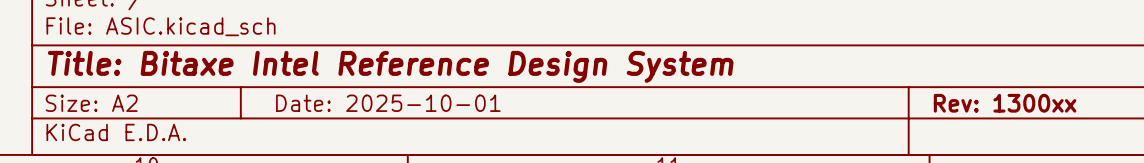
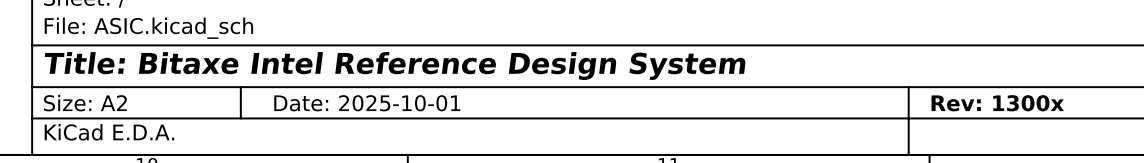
title block: Rev: 1300xx (1005, 103) -> Rev: 1300x (997, 103)

